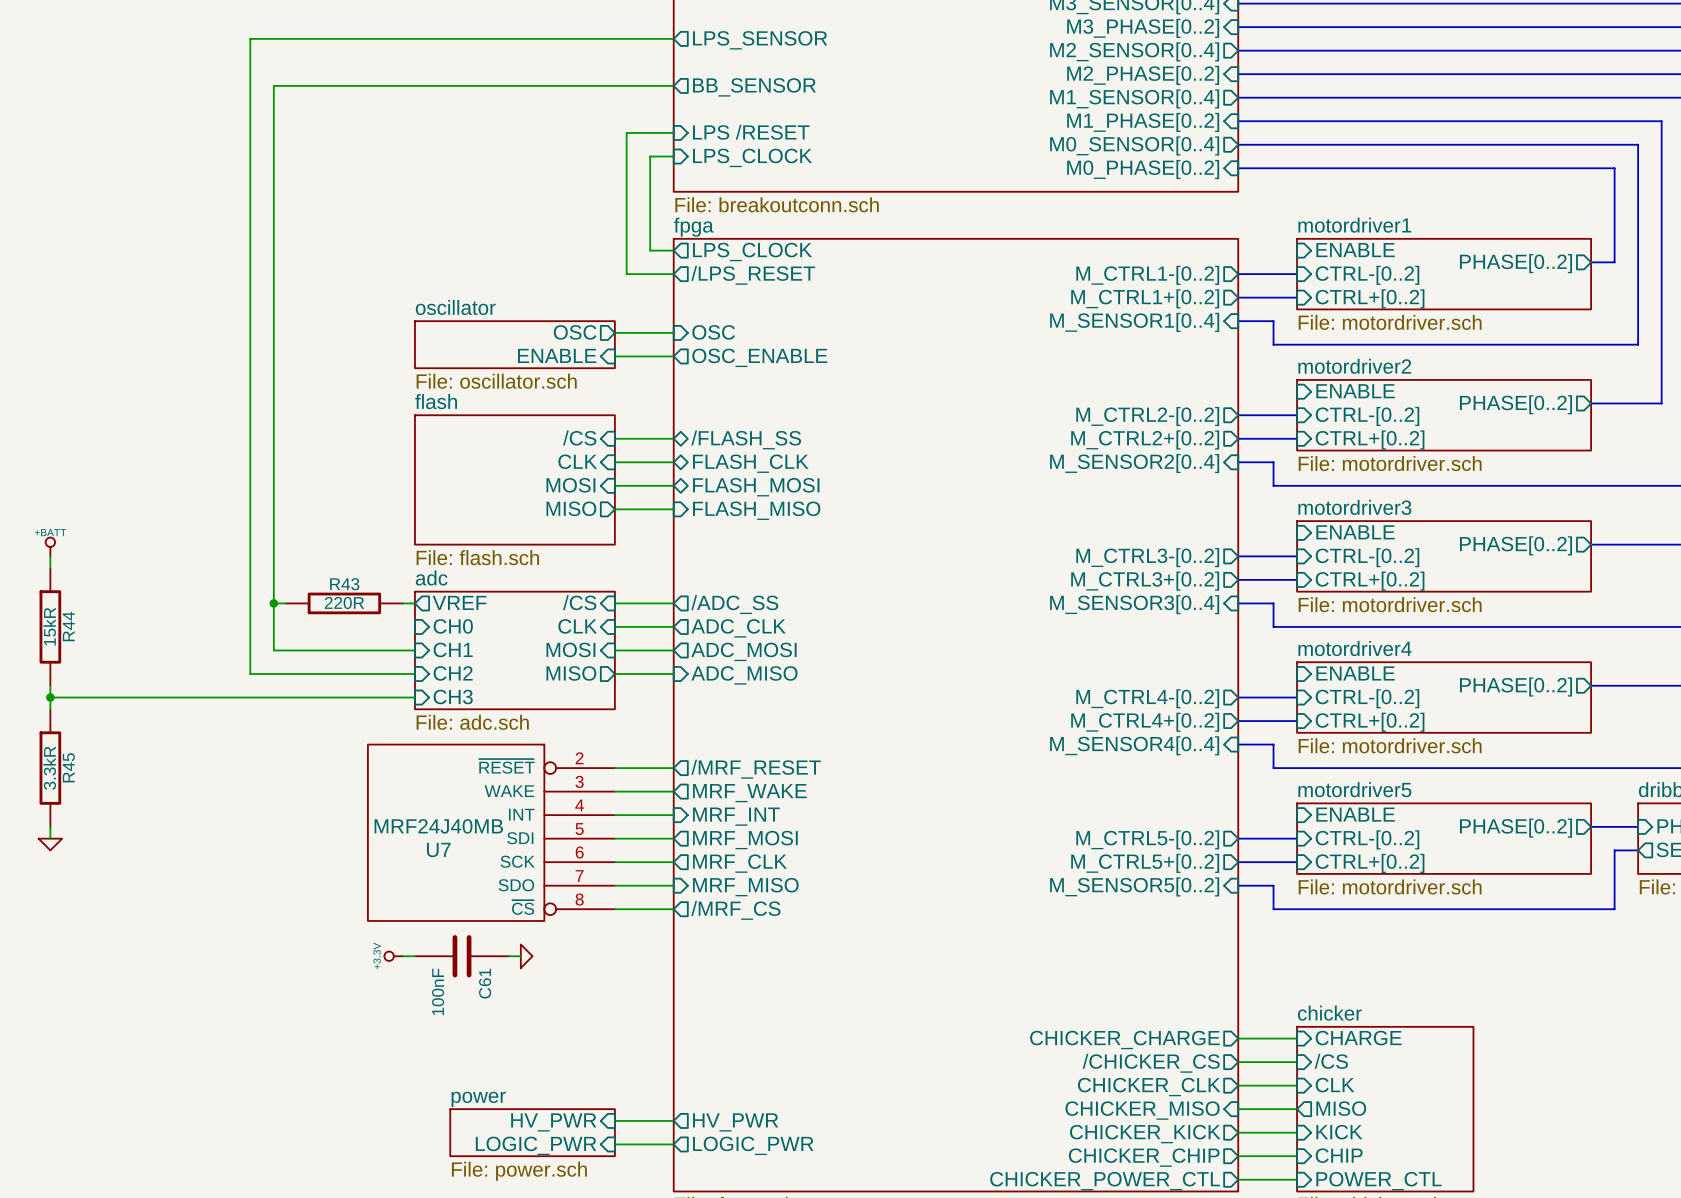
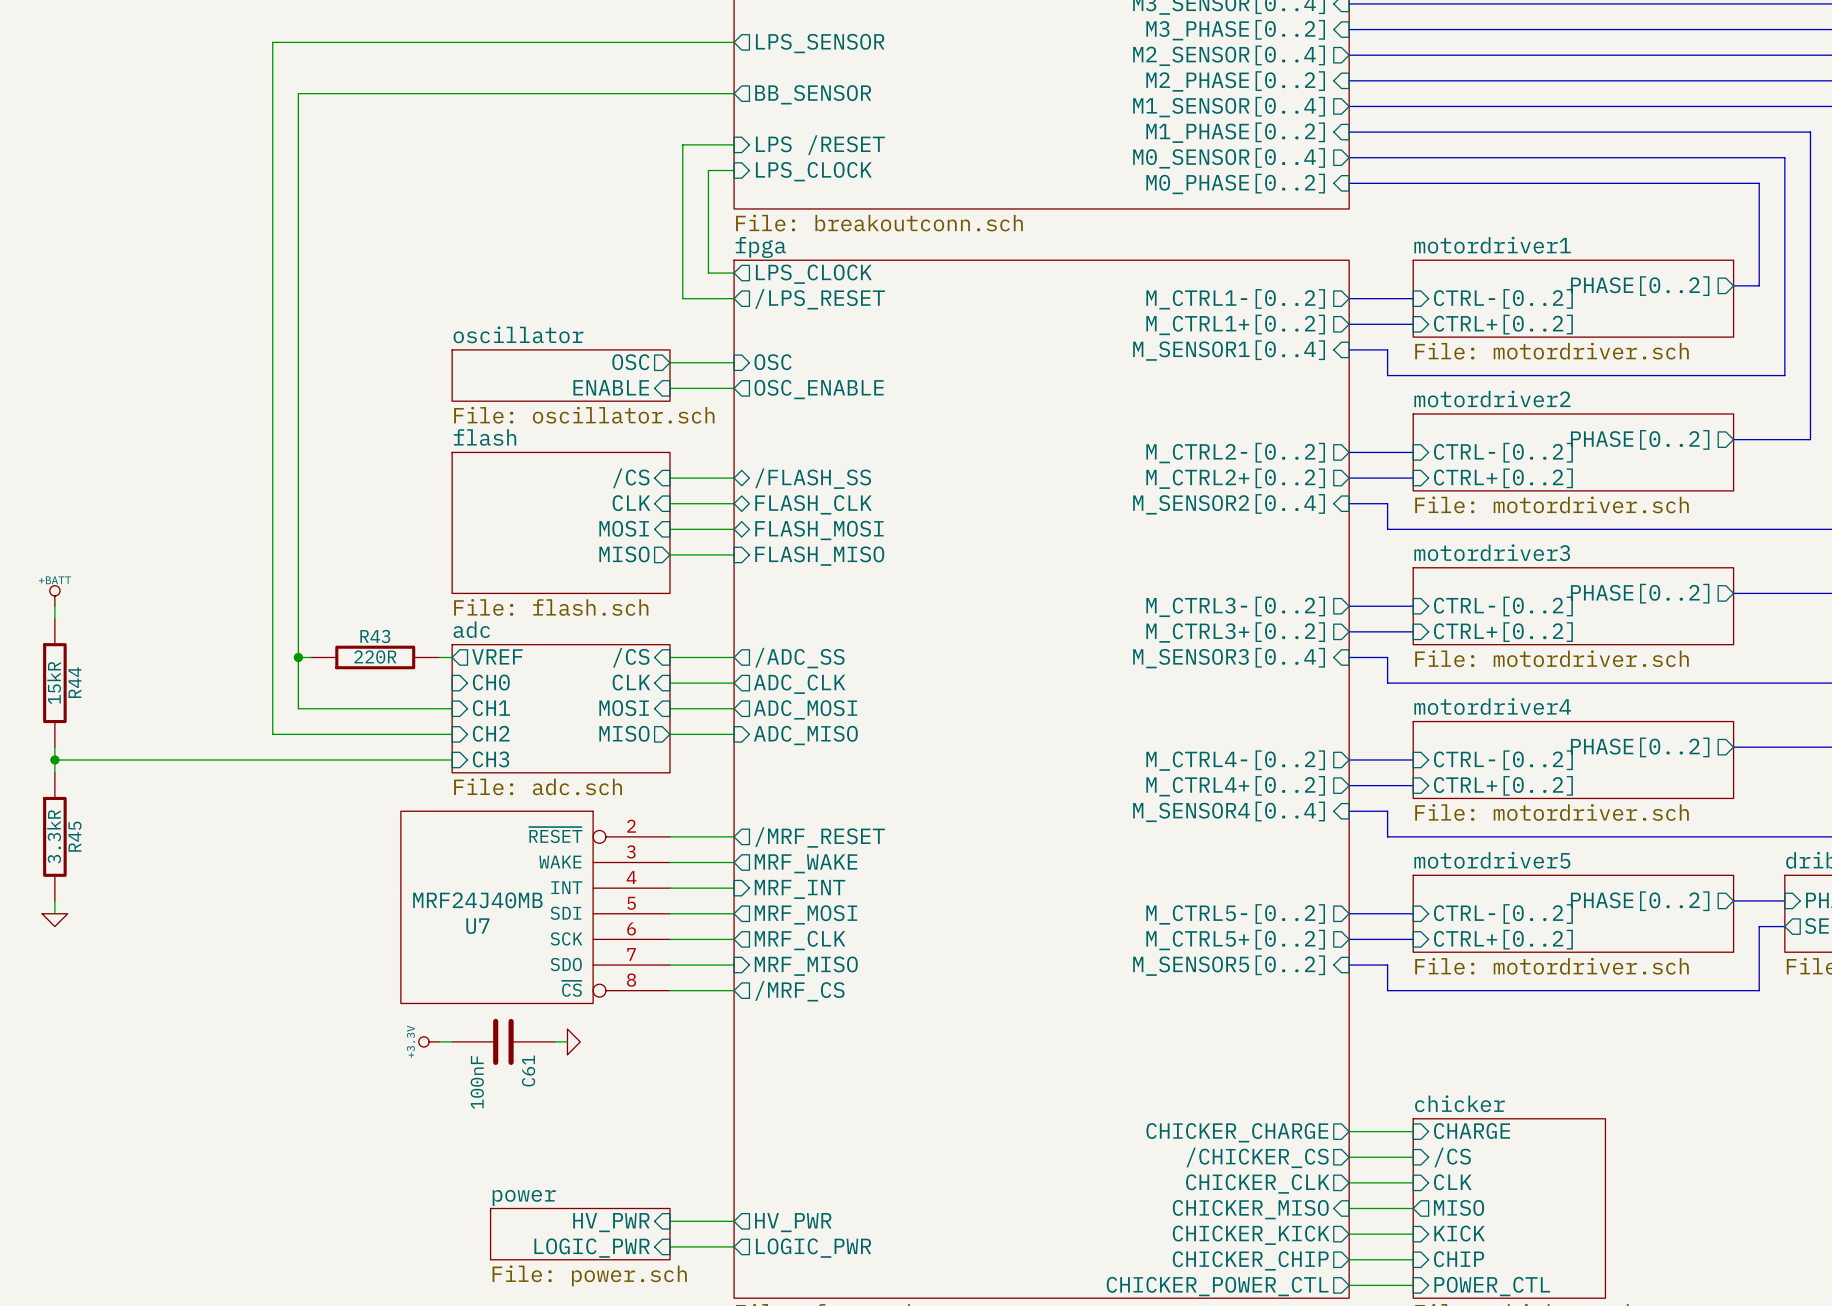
sheet pin: ENABLE (1355, 250) -> none
sheet pin: ENABLE (1355, 391) -> none
sheet pin: ENABLE (1355, 532) -> none
sheet pin: ENABLE (1355, 673) -> none
sheet pin: ENABLE (1355, 814) -> none

